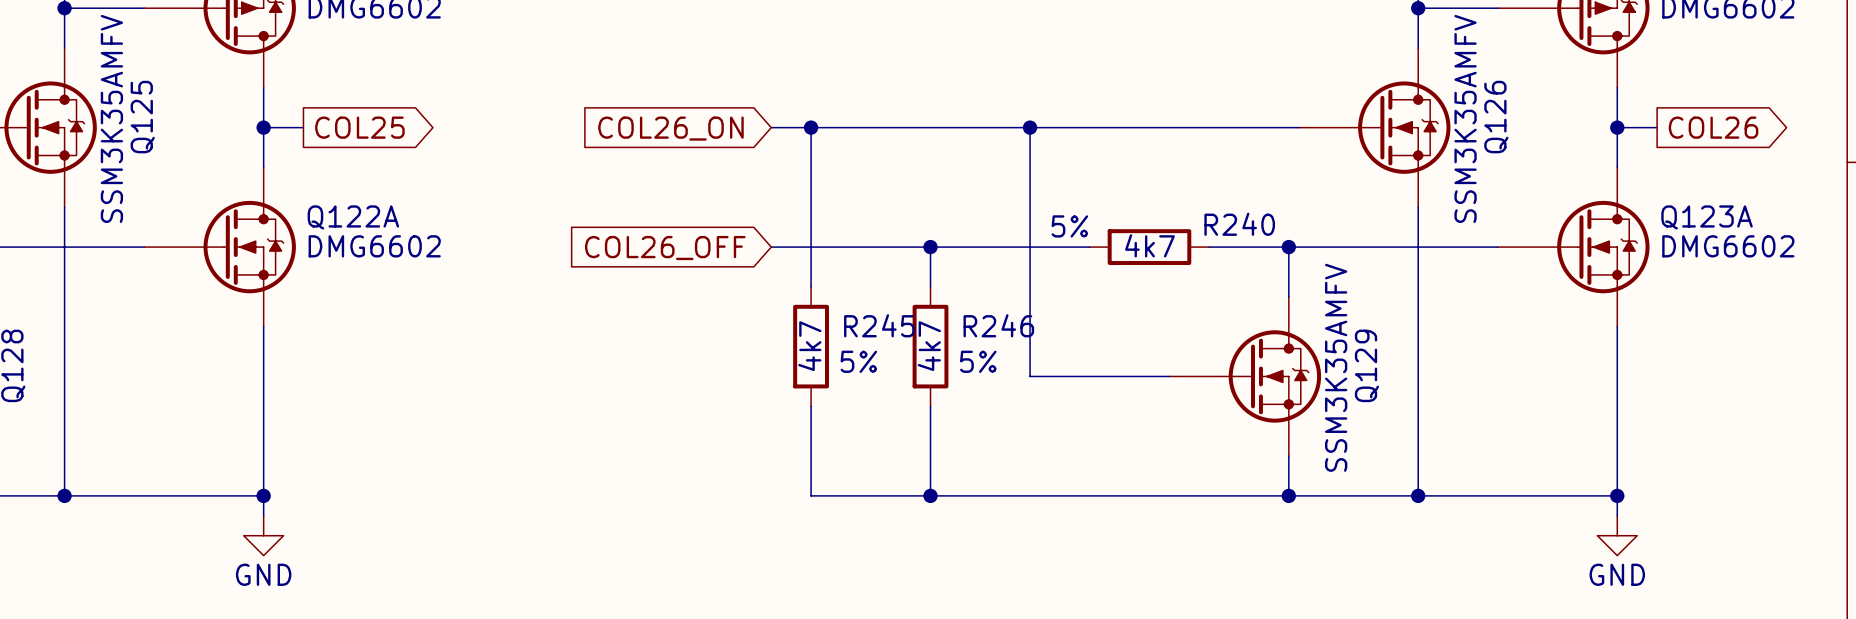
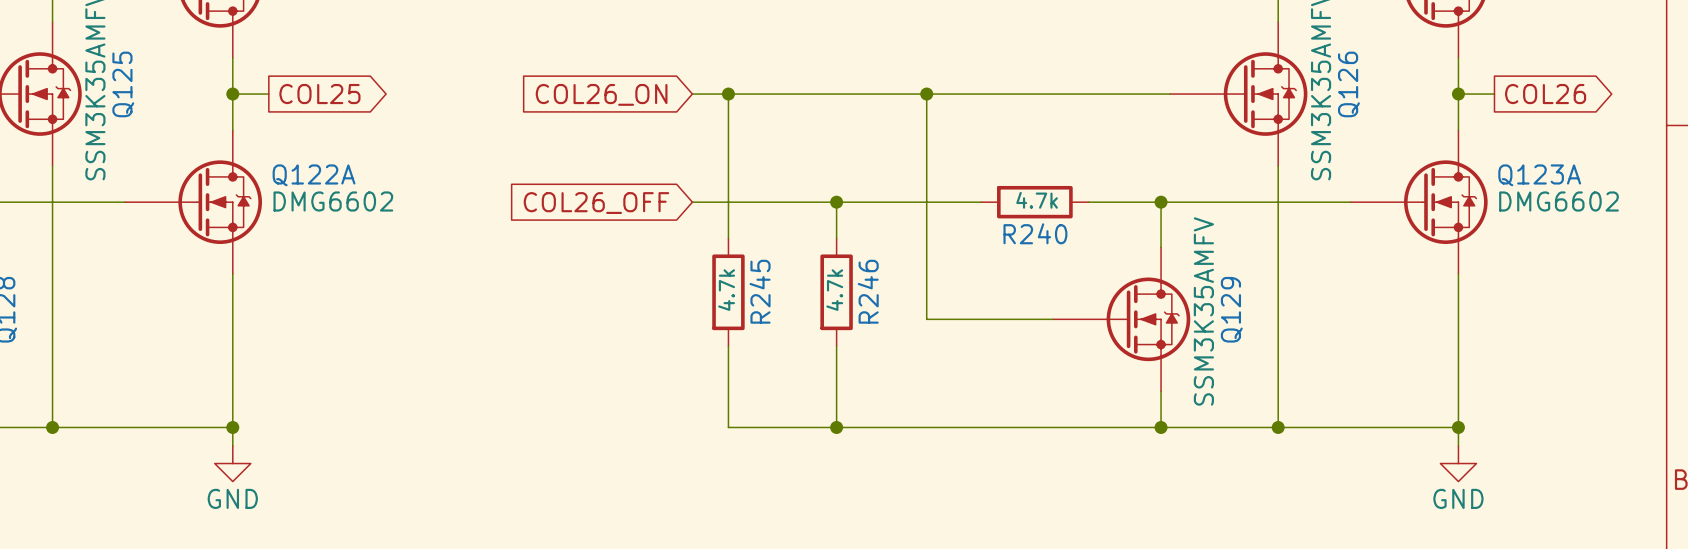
R240 name position: R240 (1239, 224) -> R240 (1035, 233)
R240 text: 5% (1069, 226) -> none
R240 text: 4k7 (1149, 245) -> none
R240 text: none -> 4.7k (1037, 200)
R245 name rotation: 0° (879, 325) -> 90° counterclockwise (760, 291)
R246 name rotation: 0° (998, 325) -> 90° counterclockwise (868, 291)
R245 text: none -> 4.7k (726, 290)
R246 text: none -> 4.7k (834, 290)
R245 text: 4k7 (809, 346) -> none
R246 text: 4k7 (929, 346) -> none
R245 text: 5% (858, 361) -> none
R246 text: 5% (978, 361) -> none

